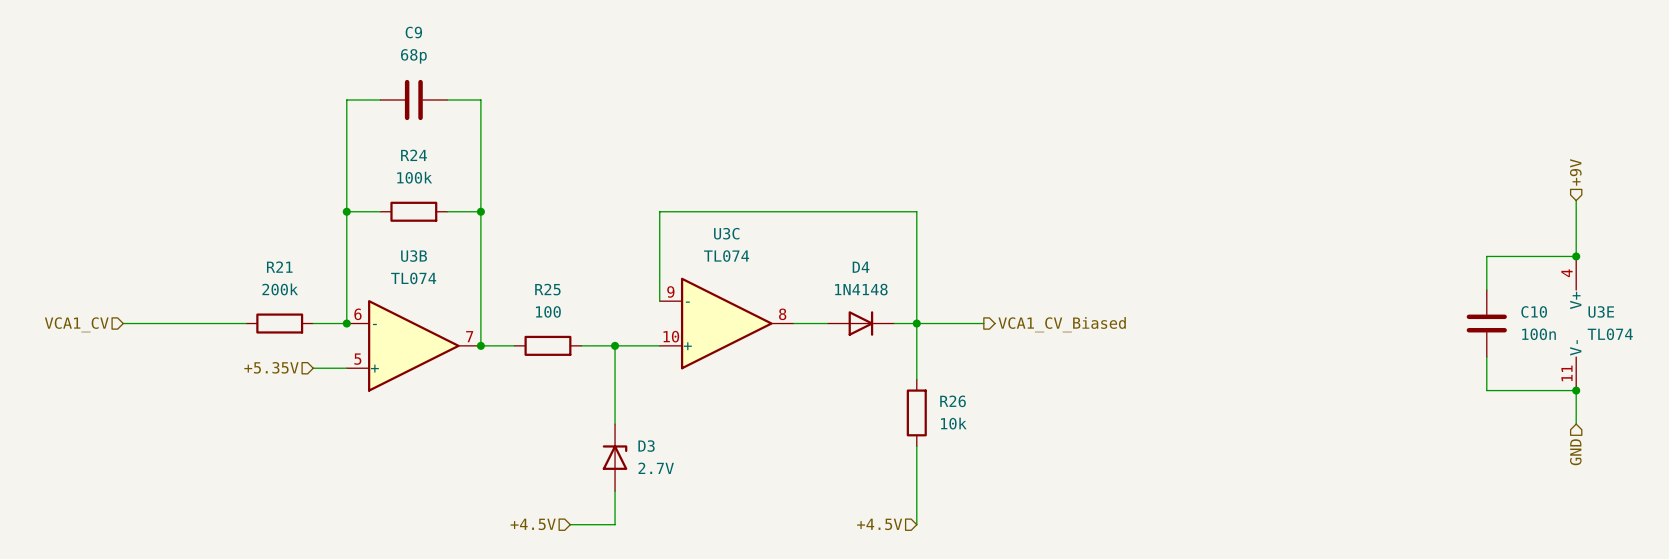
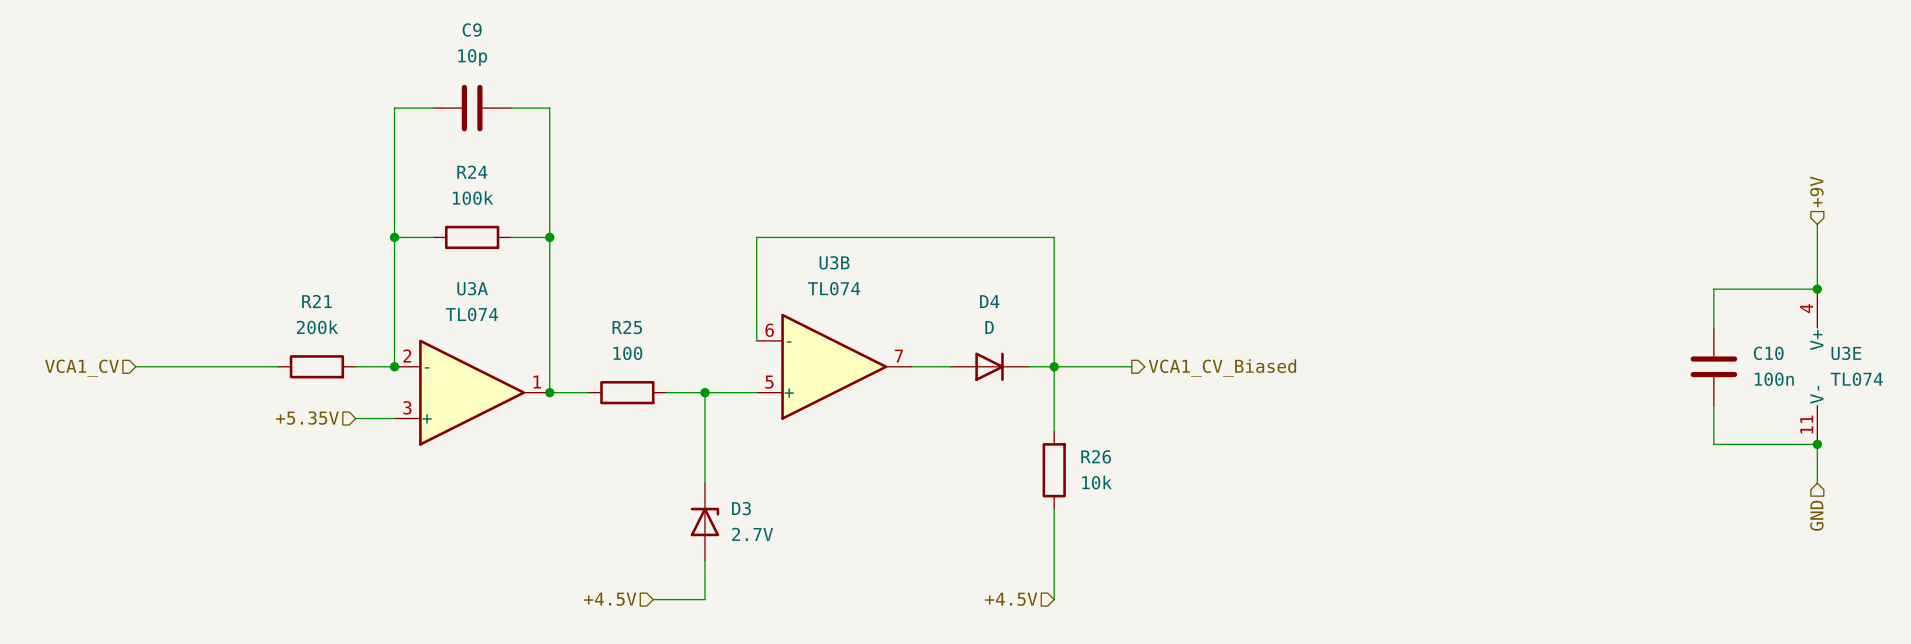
C9 value: 68p (413, 56) -> 10p (472, 57)
D4 value: 1N4148 (861, 289) -> D (989, 327)
U3C: TL074 (726, 323) -> none
U3B position: (413, 345) -> (834, 366)
U3A: none -> TL074 (472, 392)

